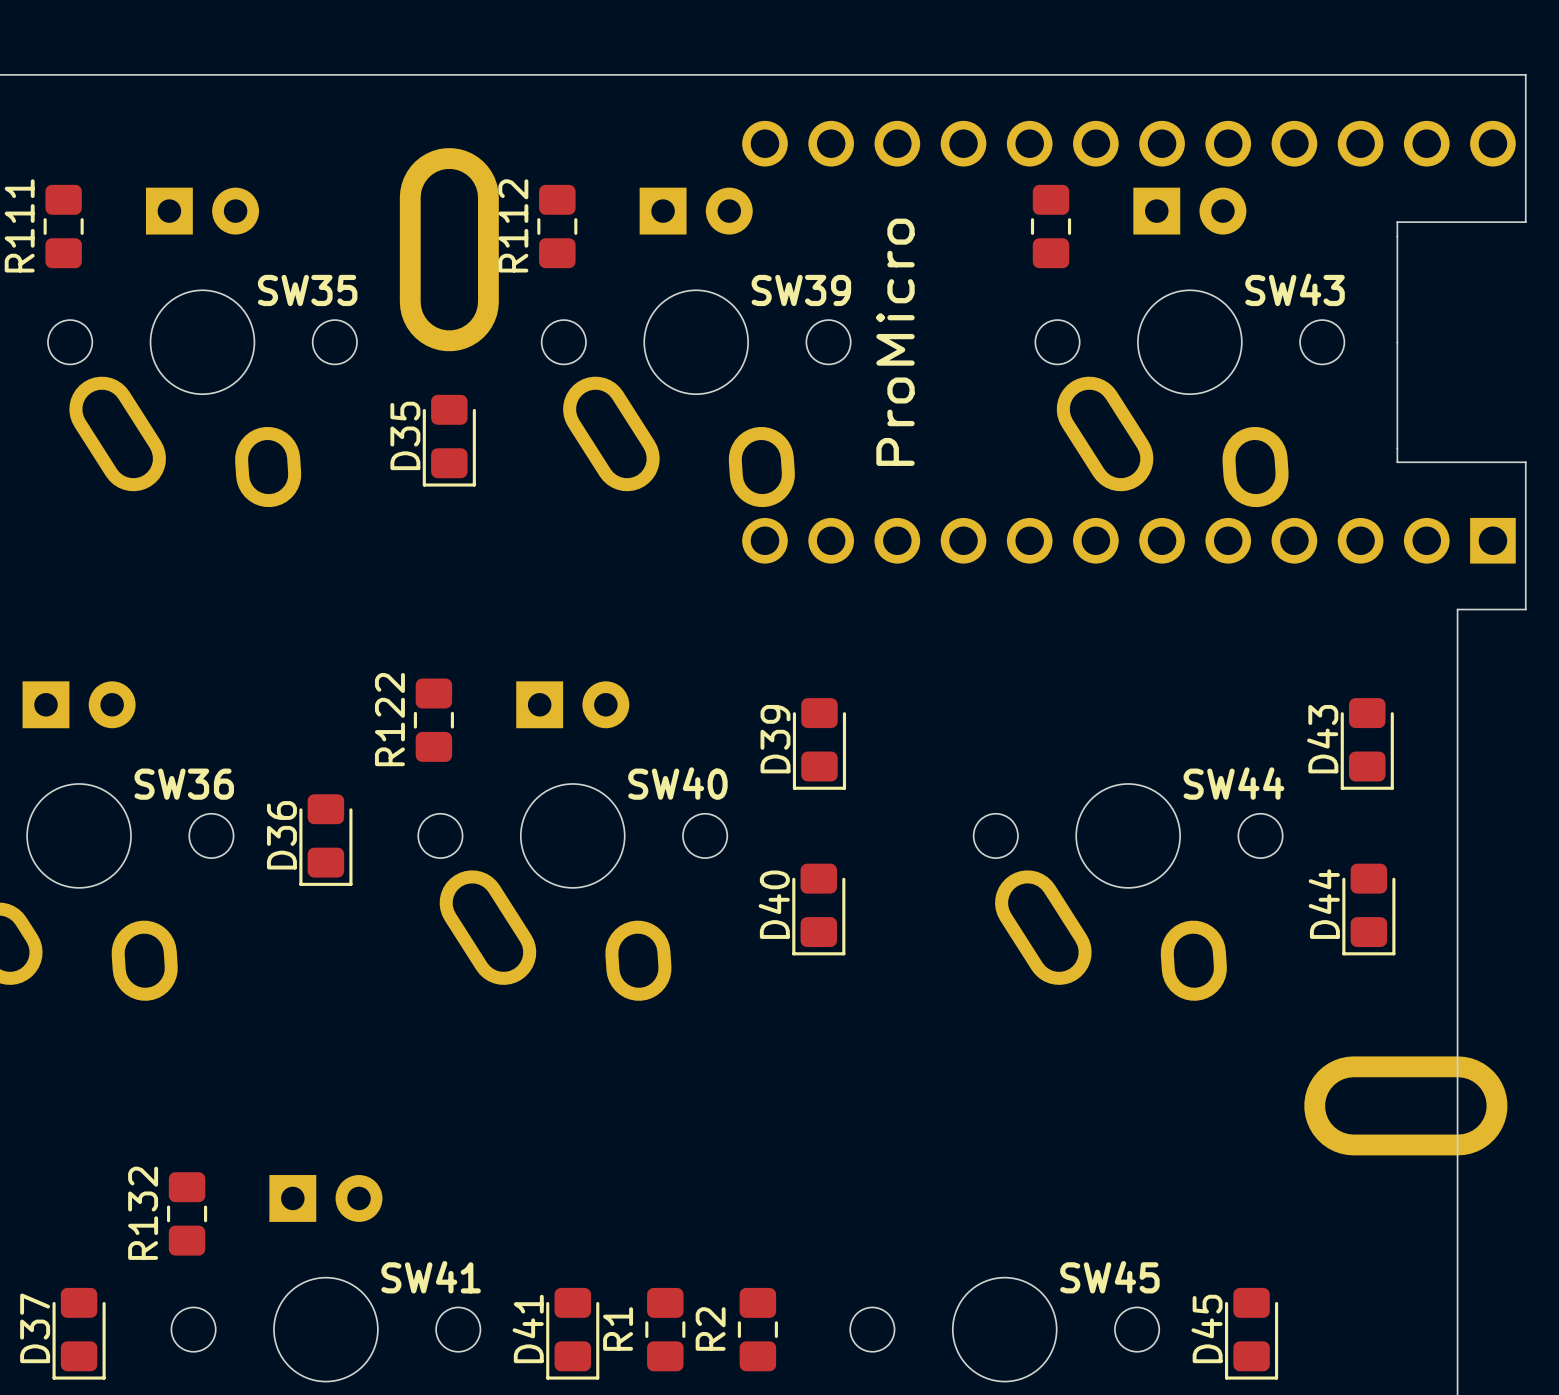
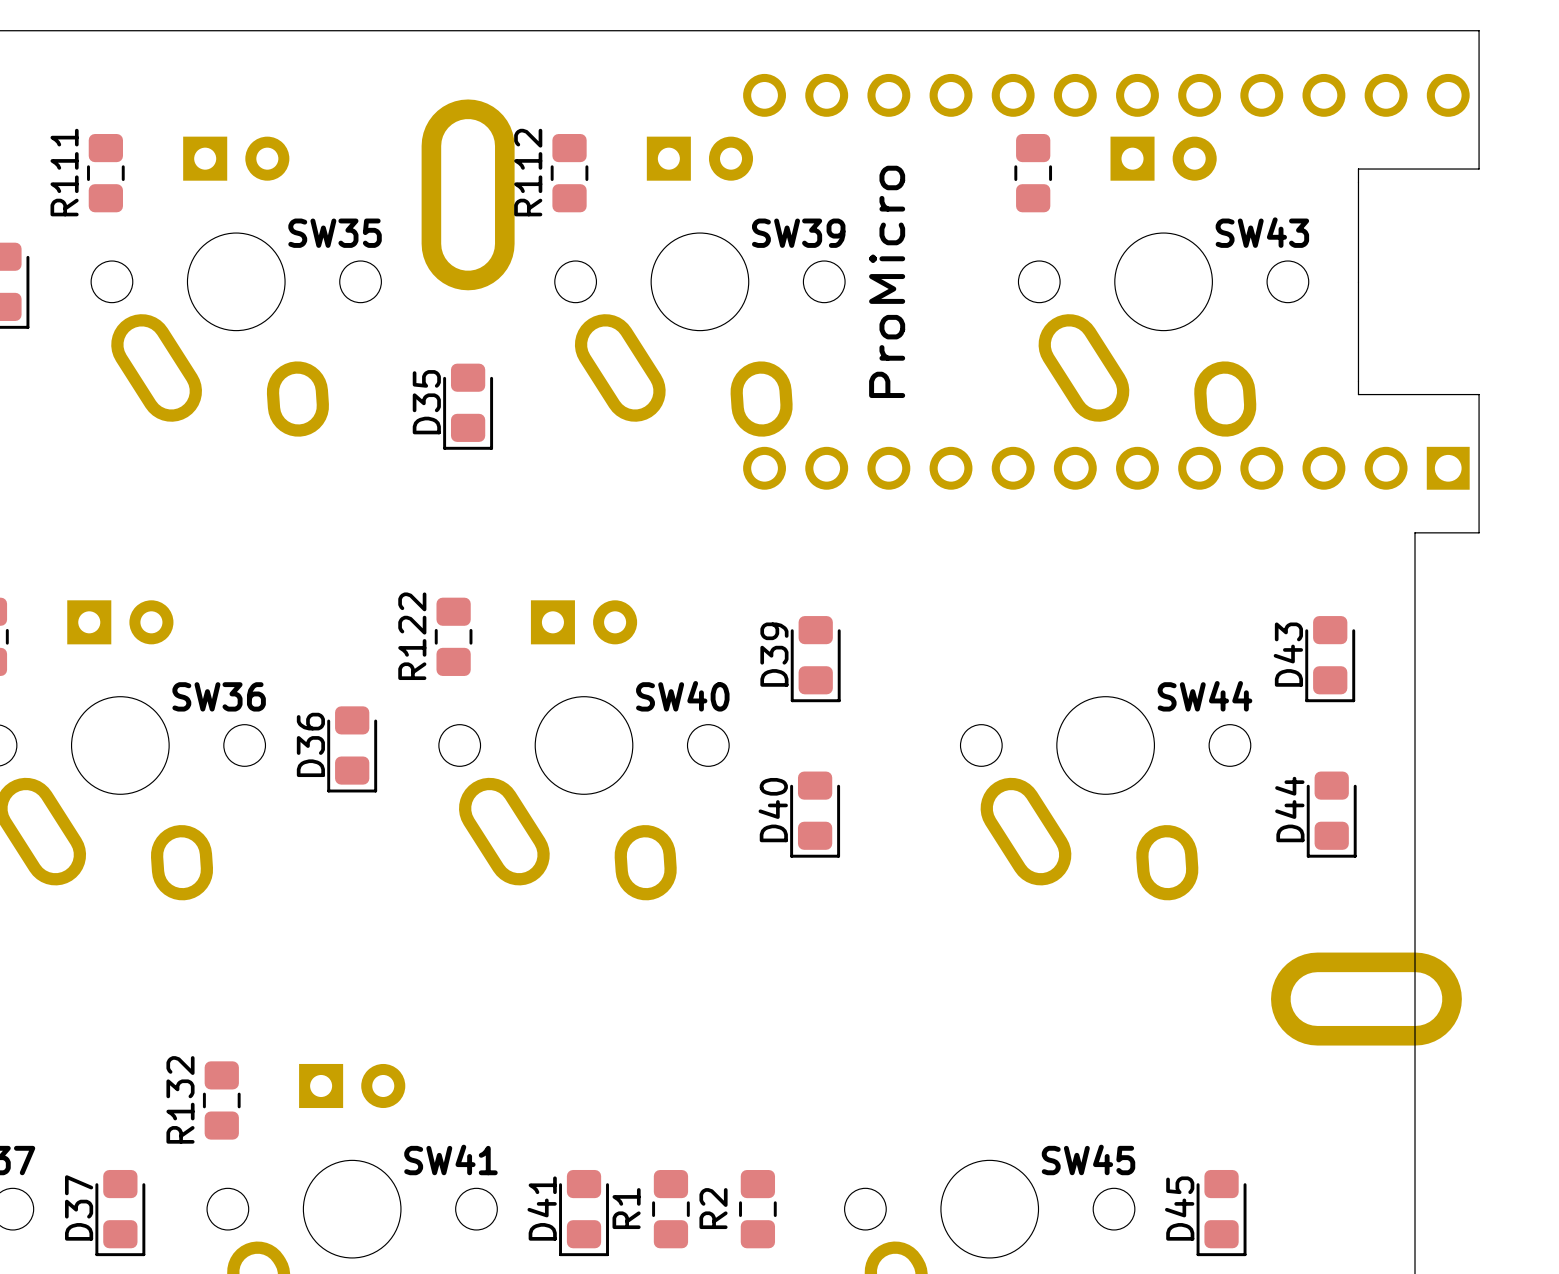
D35 position: (449, 440) -> (468, 406)

